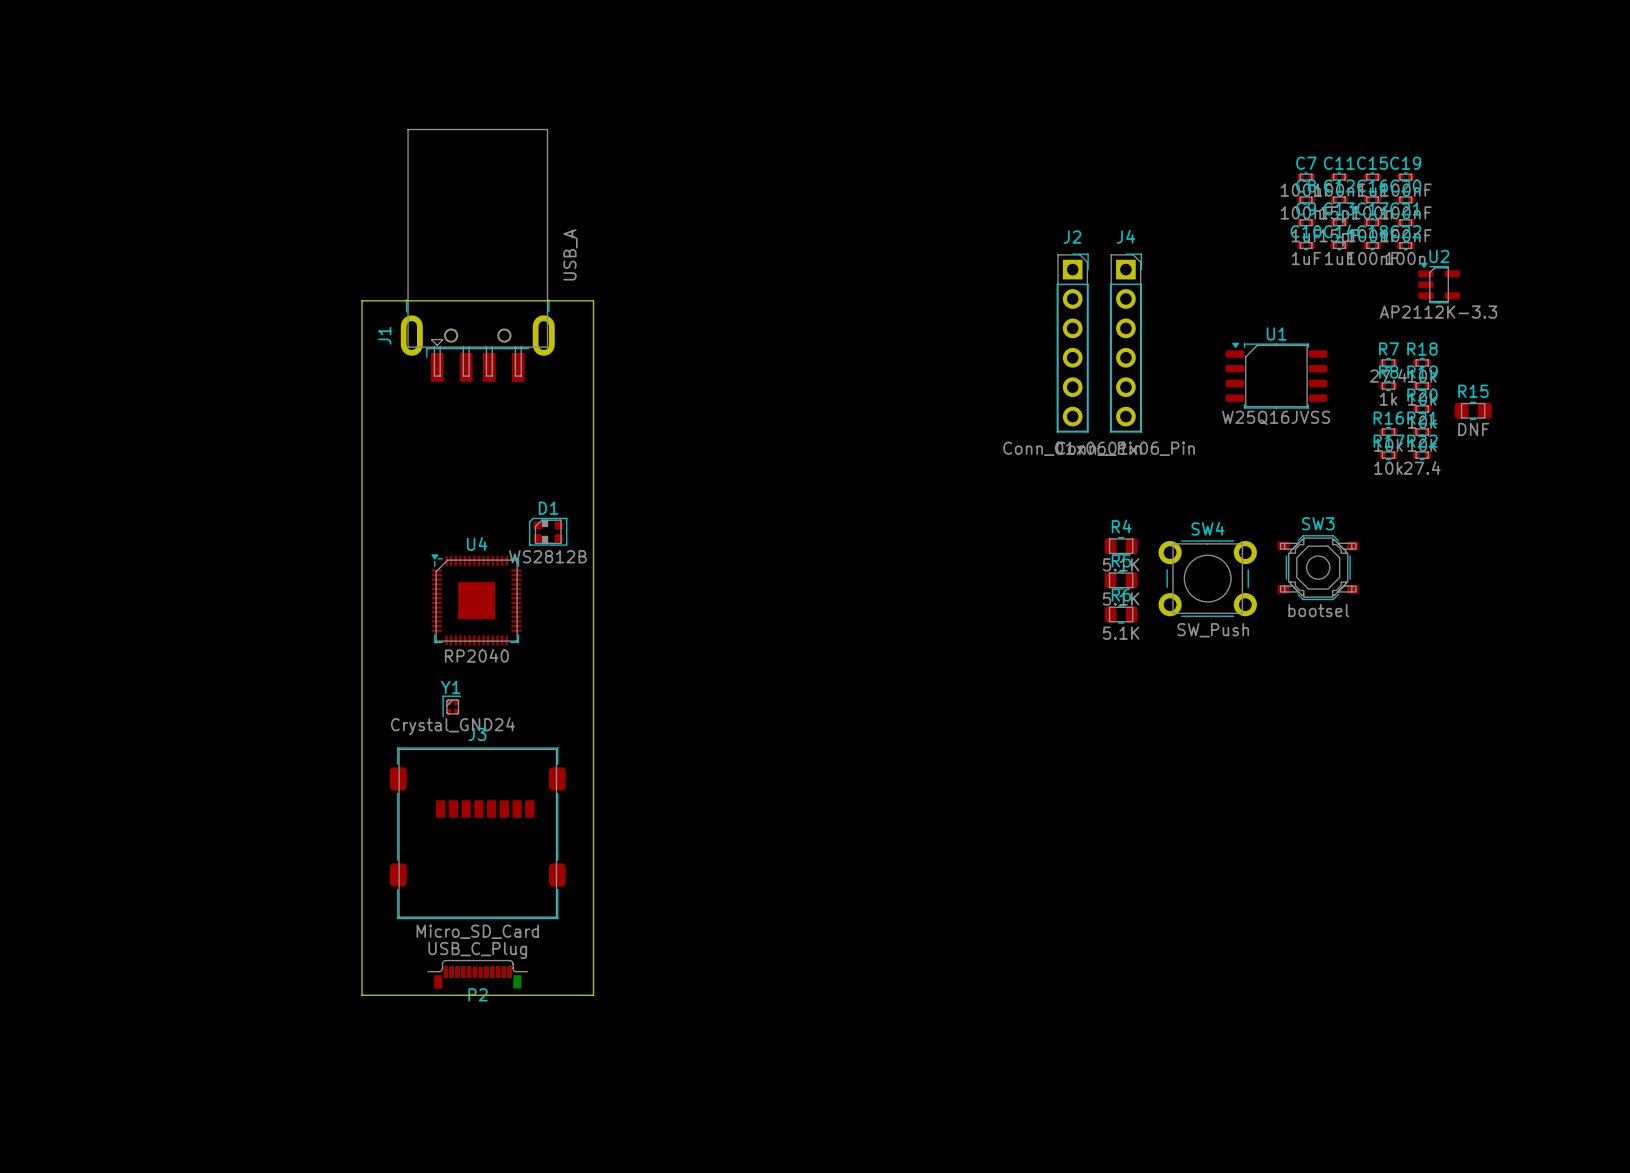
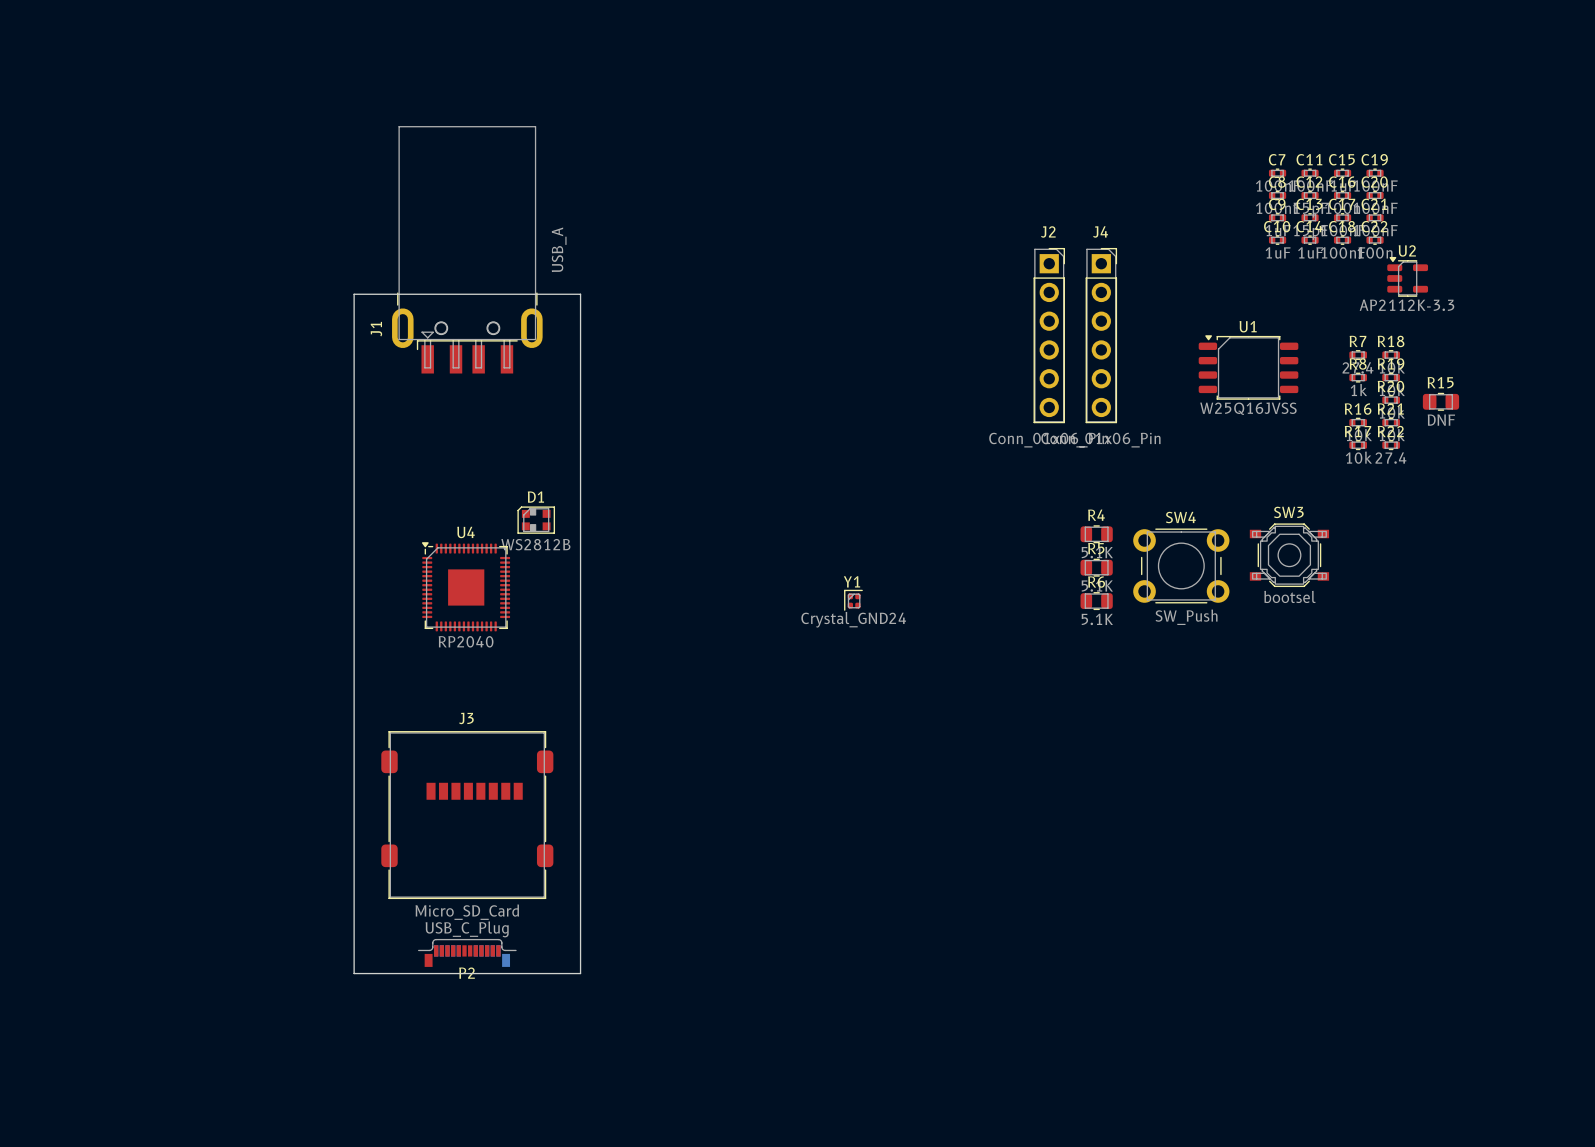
Y1 position: (452, 706) -> (853, 600)

